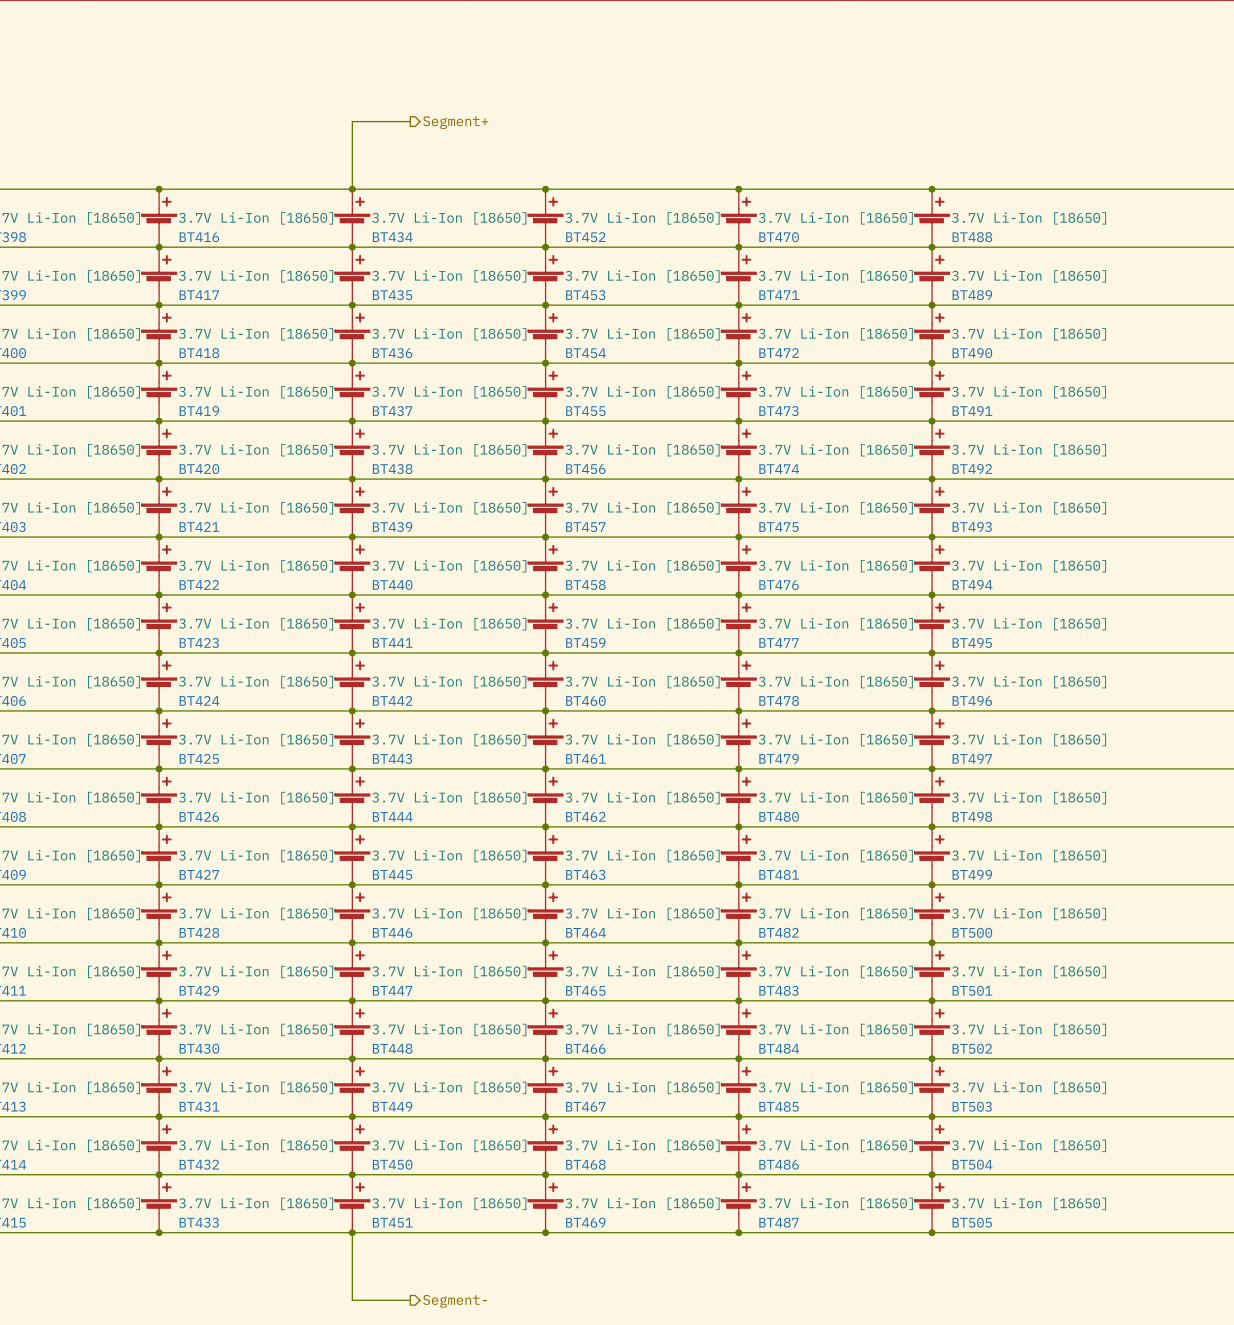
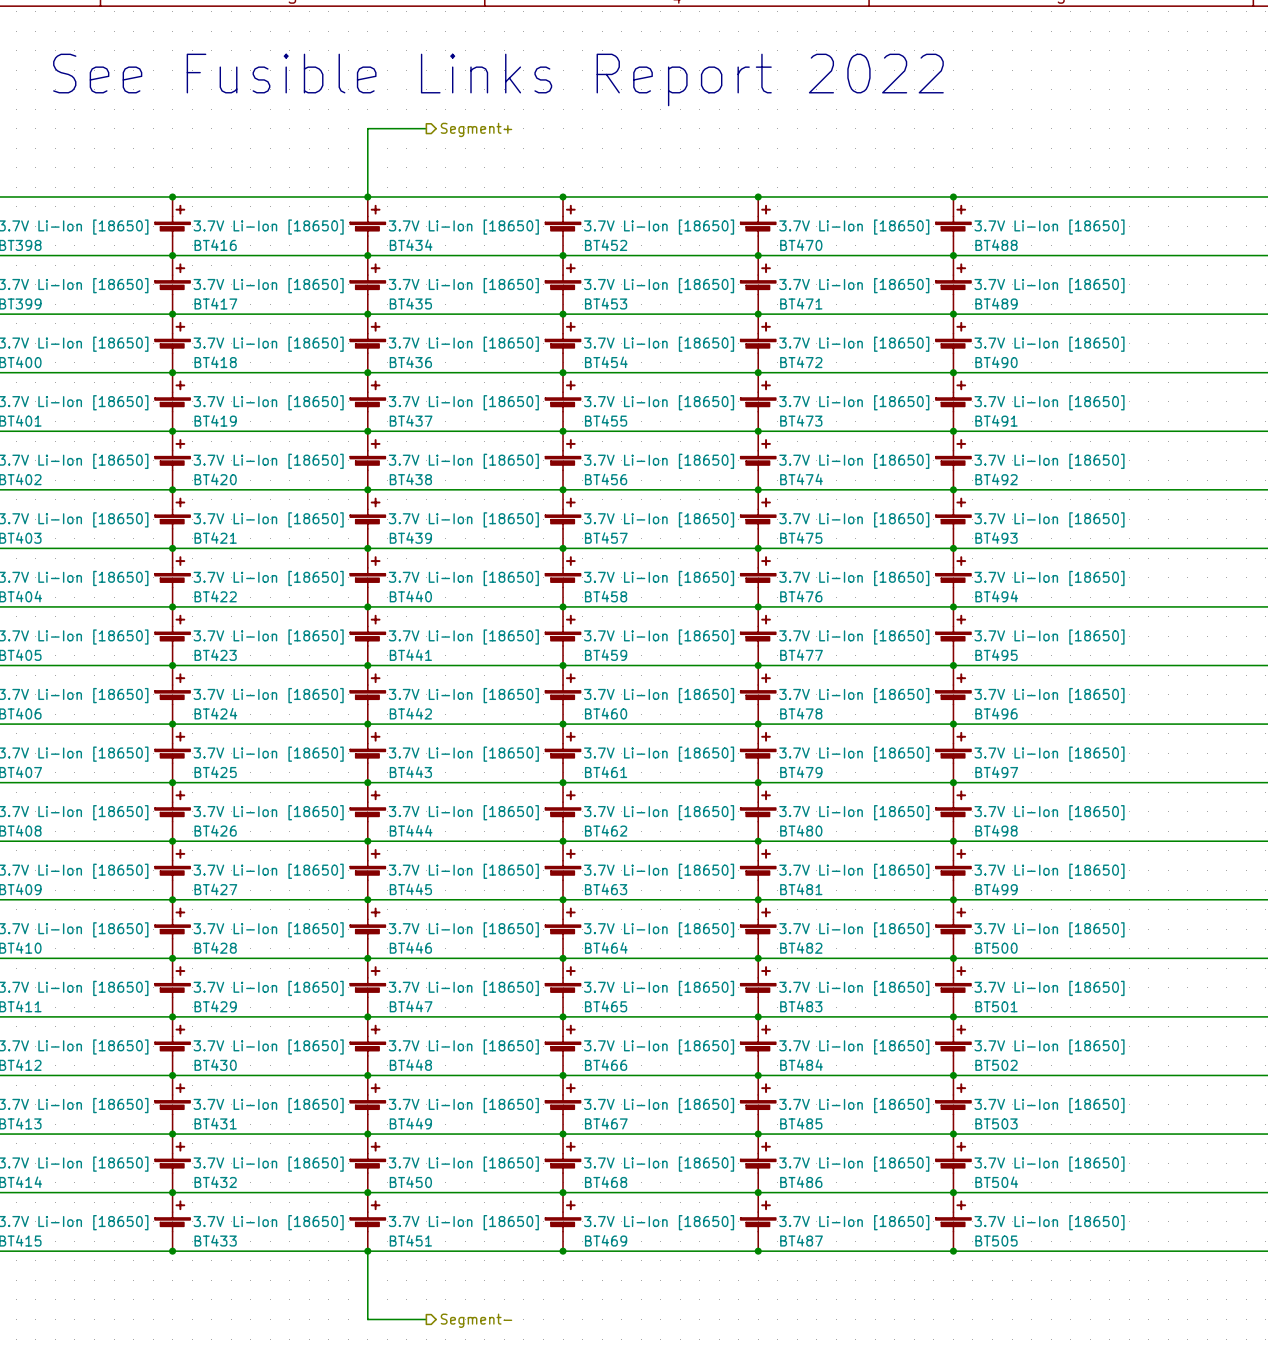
text: none -> See Fusible Links Report 2022 (498, 79)

